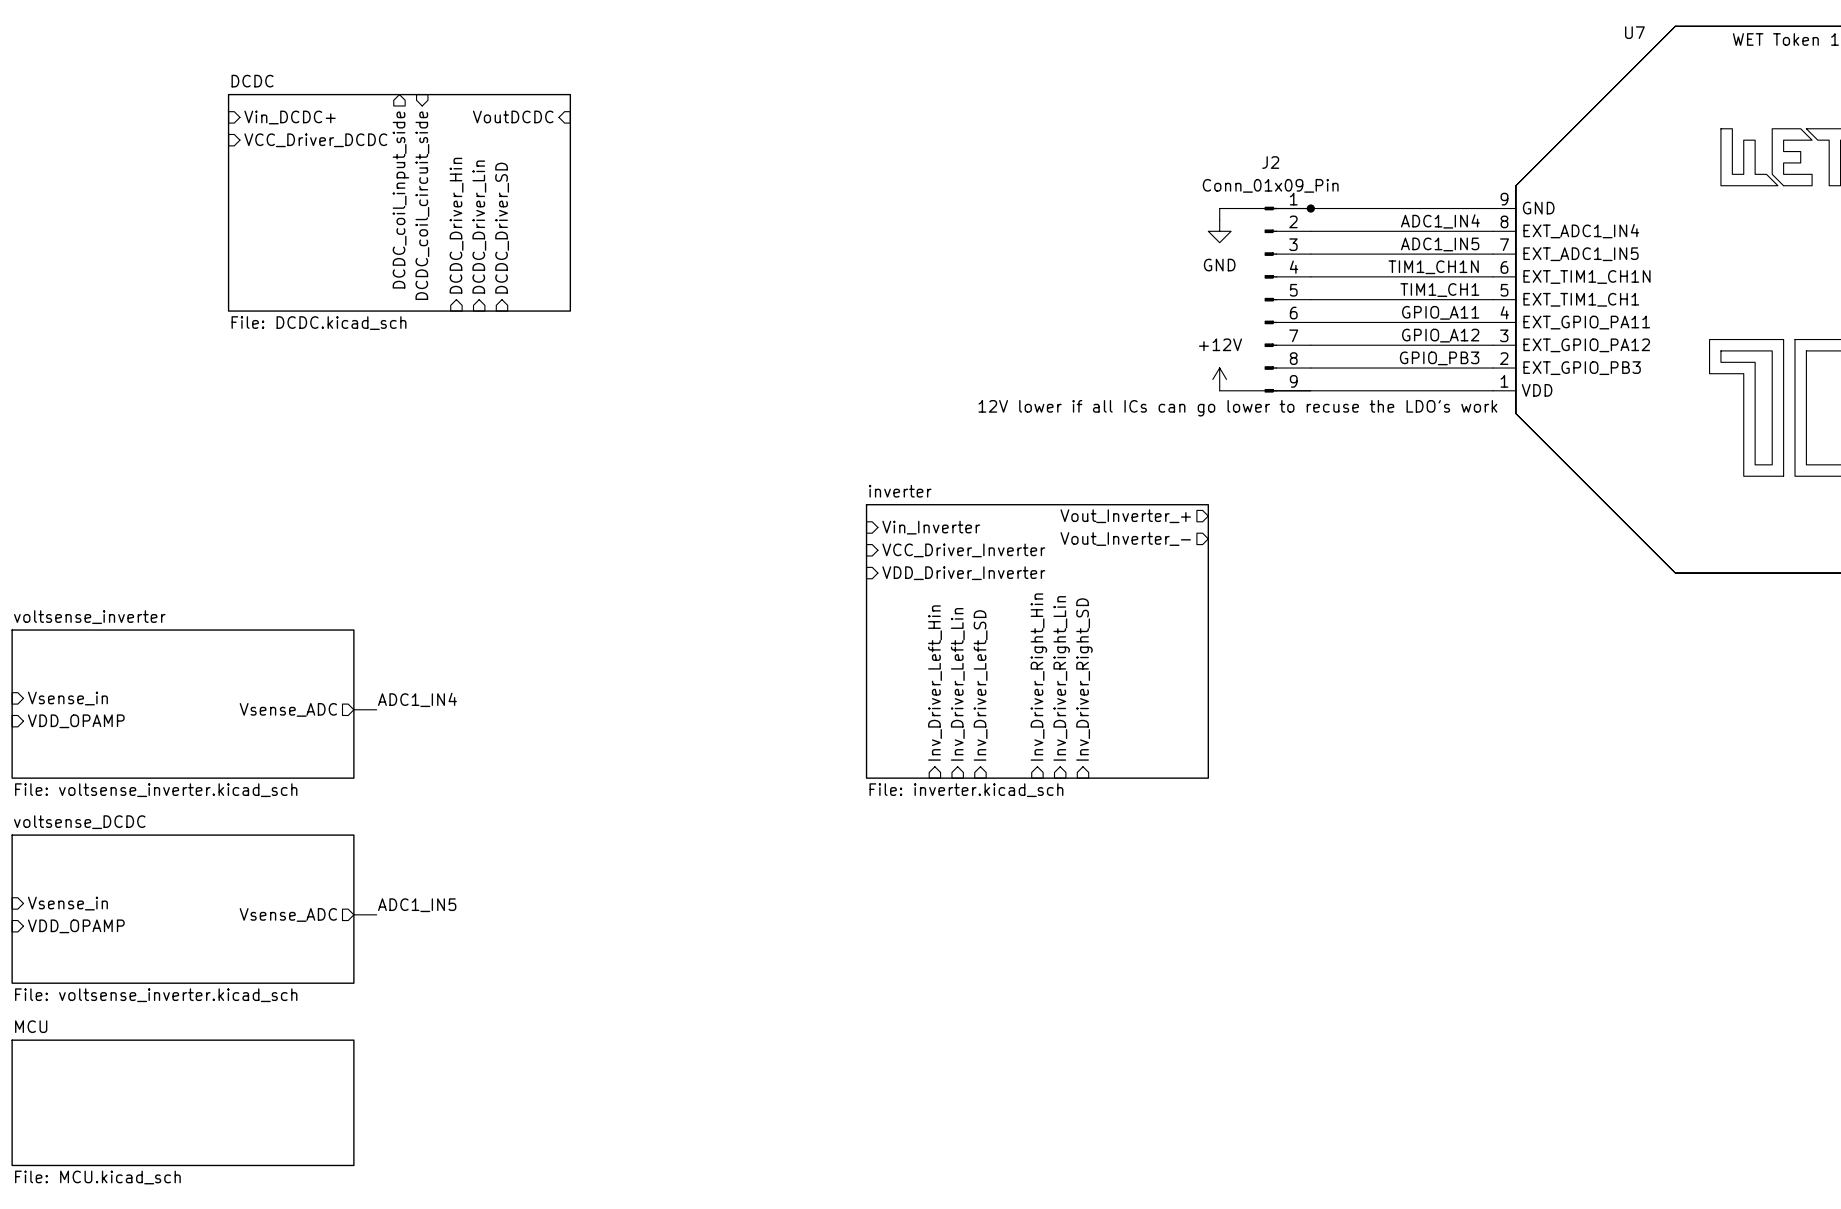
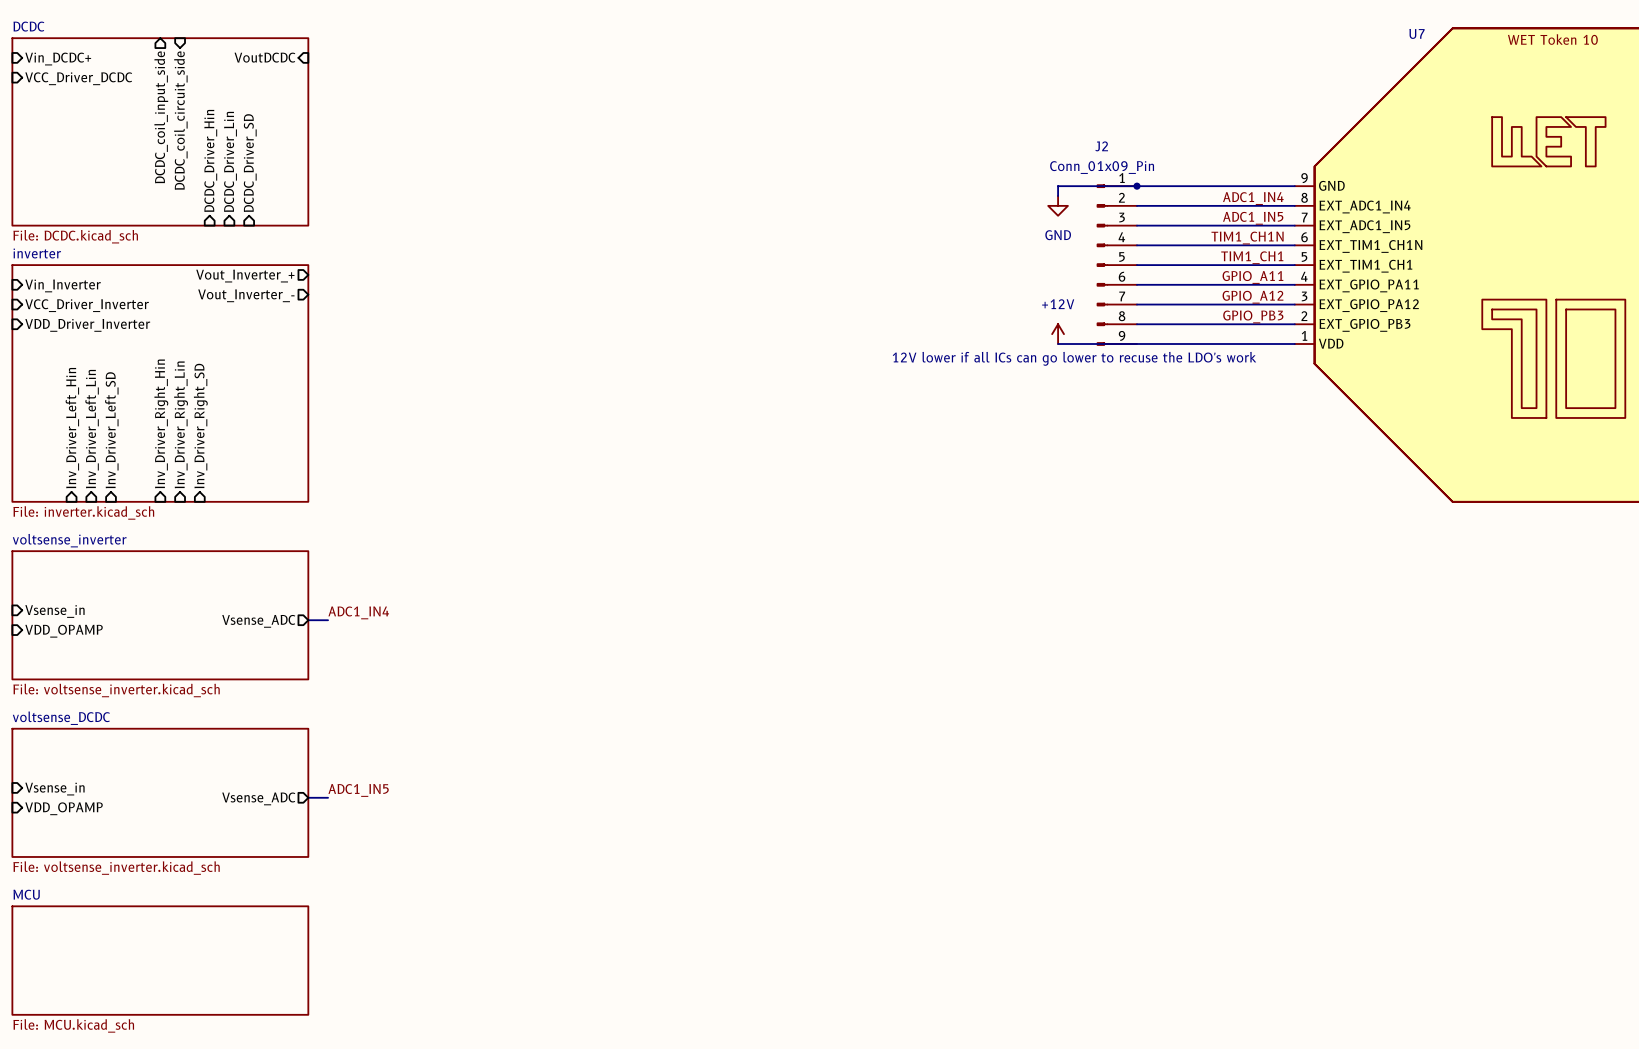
sheet pin position: VoutDCDC (513, 116) -> VoutDCDC (264, 57)
sheet pin position: Vin_DCDC+ (290, 117) -> Vin_DCDC+ (58, 59)
sheet pin position: VCC_Driver_DCDC (315, 140) -> VCC_Driver_DCDC (78, 78)
sheet pin position: DCDC_coil_input_side (400, 200) -> DCDC_coil_input_side (161, 117)
sheet DCDC position: (399, 202) -> (160, 131)
sheet pin position: DCDC_coil_circuit_side (422, 205) -> DCDC_coil_circuit_side (180, 120)
sheet pin position: DCDC_Driver_Hin (456, 225) -> DCDC_Driver_Hin (210, 160)
sheet pin position: DCDC_Driver_Lin (479, 227) -> DCDC_Driver_Lin (230, 161)
sheet pin position: DCDC_Driver_SD (502, 228) -> DCDC_Driver_SD (250, 163)
sheet pin: none -> Vout_Inverter_+ (245, 276)
sheet pin: none -> Vin_Inverter (63, 285)
sheet pin: none -> Vout_Inverter_- (246, 295)
sheet pin: none -> VCC_Driver_Inverter (87, 305)
sheet pin: none -> VDD_Driver_Inverter (87, 325)
sheet inverter: none -> File: inverter.kicad_sch (160, 383)
sheet pin: none -> Inv_Driver_Right_Hin (161, 423)
sheet pin: none -> Inv_Driver_Right_Lin (181, 424)
sheet pin: none -> Inv_Driver_Right_SD (200, 426)
sheet pin: none -> Inv_Driver_Left_Hin (72, 428)
sheet pin: none -> Inv_Driver_Left_Lin (92, 429)
sheet pin: none -> Inv_Driver_Left_SD (111, 430)
sheet pin: Vout_Inverter_+ (1125, 516) -> none
sheet pin: Vin_Inverter (931, 527) -> none
sheet pin: Vout_Inverter_- (1125, 539) -> none
sheet pin: VCC_Driver_Inverter (963, 550) -> none
sheet pin: VDD_Driver_Inverter (963, 573) -> none
sheet inverter: File: inverter.kicad_sch (1037, 641) -> none
sheet pin: Inv_Driver_Right_Hin (1038, 677) -> none
sheet pin: Inv_Driver_Right_Lin (1061, 678) -> none
sheet pin: Inv_Driver_Right_SD (1084, 679) -> none
sheet pin: Inv_Driver_Left_Hin (935, 683) -> none
sheet pin: Inv_Driver_Left_Lin (957, 684) -> none
sheet pin: Inv_Driver_Left_SD (980, 685) -> none

